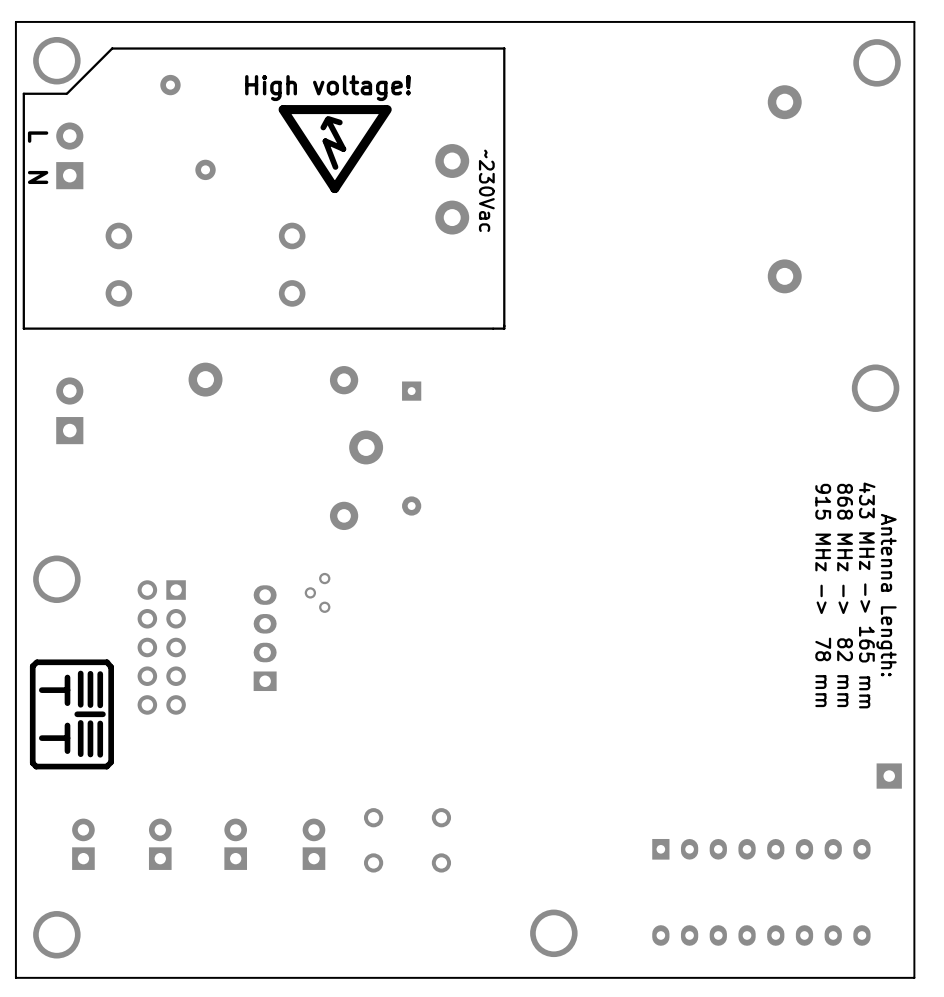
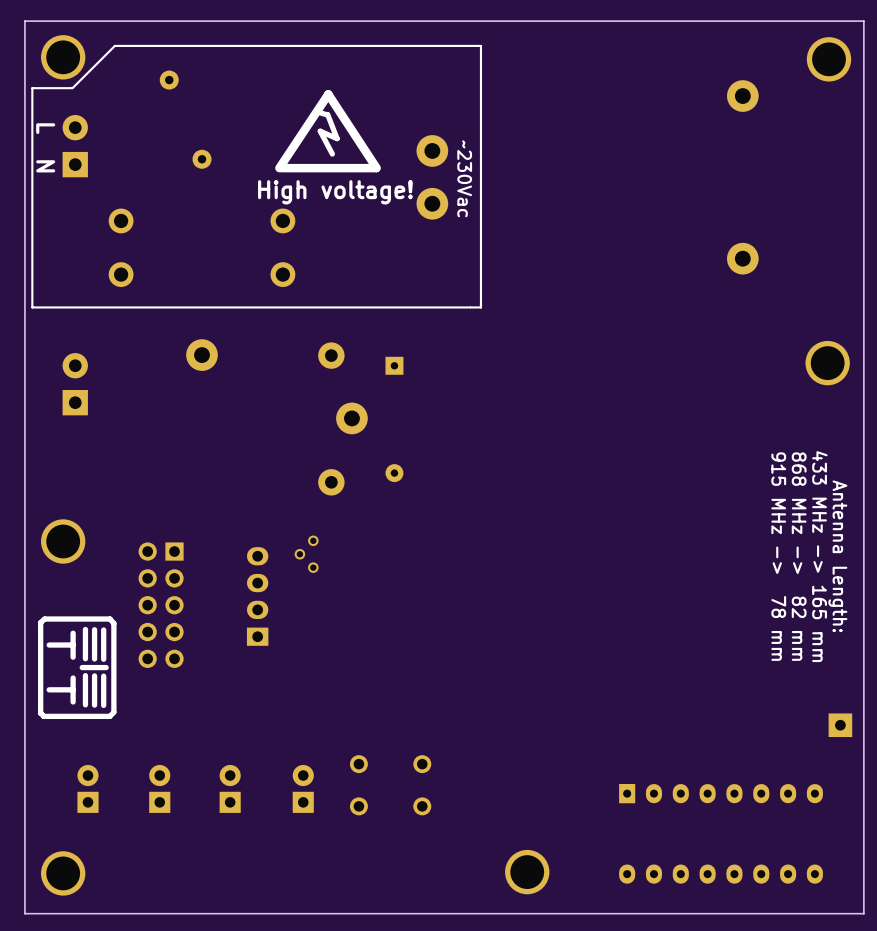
text position: High voltage! (328, 88) -> High voltage! (335, 192)
line: (385, 109) (283, 109) -> (375, 168) (281, 168)
line: (387, 109) (334, 188) (283, 109) -> none
line: none -> (327, 114) (337, 138) (320, 131) (332, 154)
line: (330, 124) (343, 149) (325, 141) (335, 167) -> none
line: none -> (376, 168) (328, 94) (279, 168)

